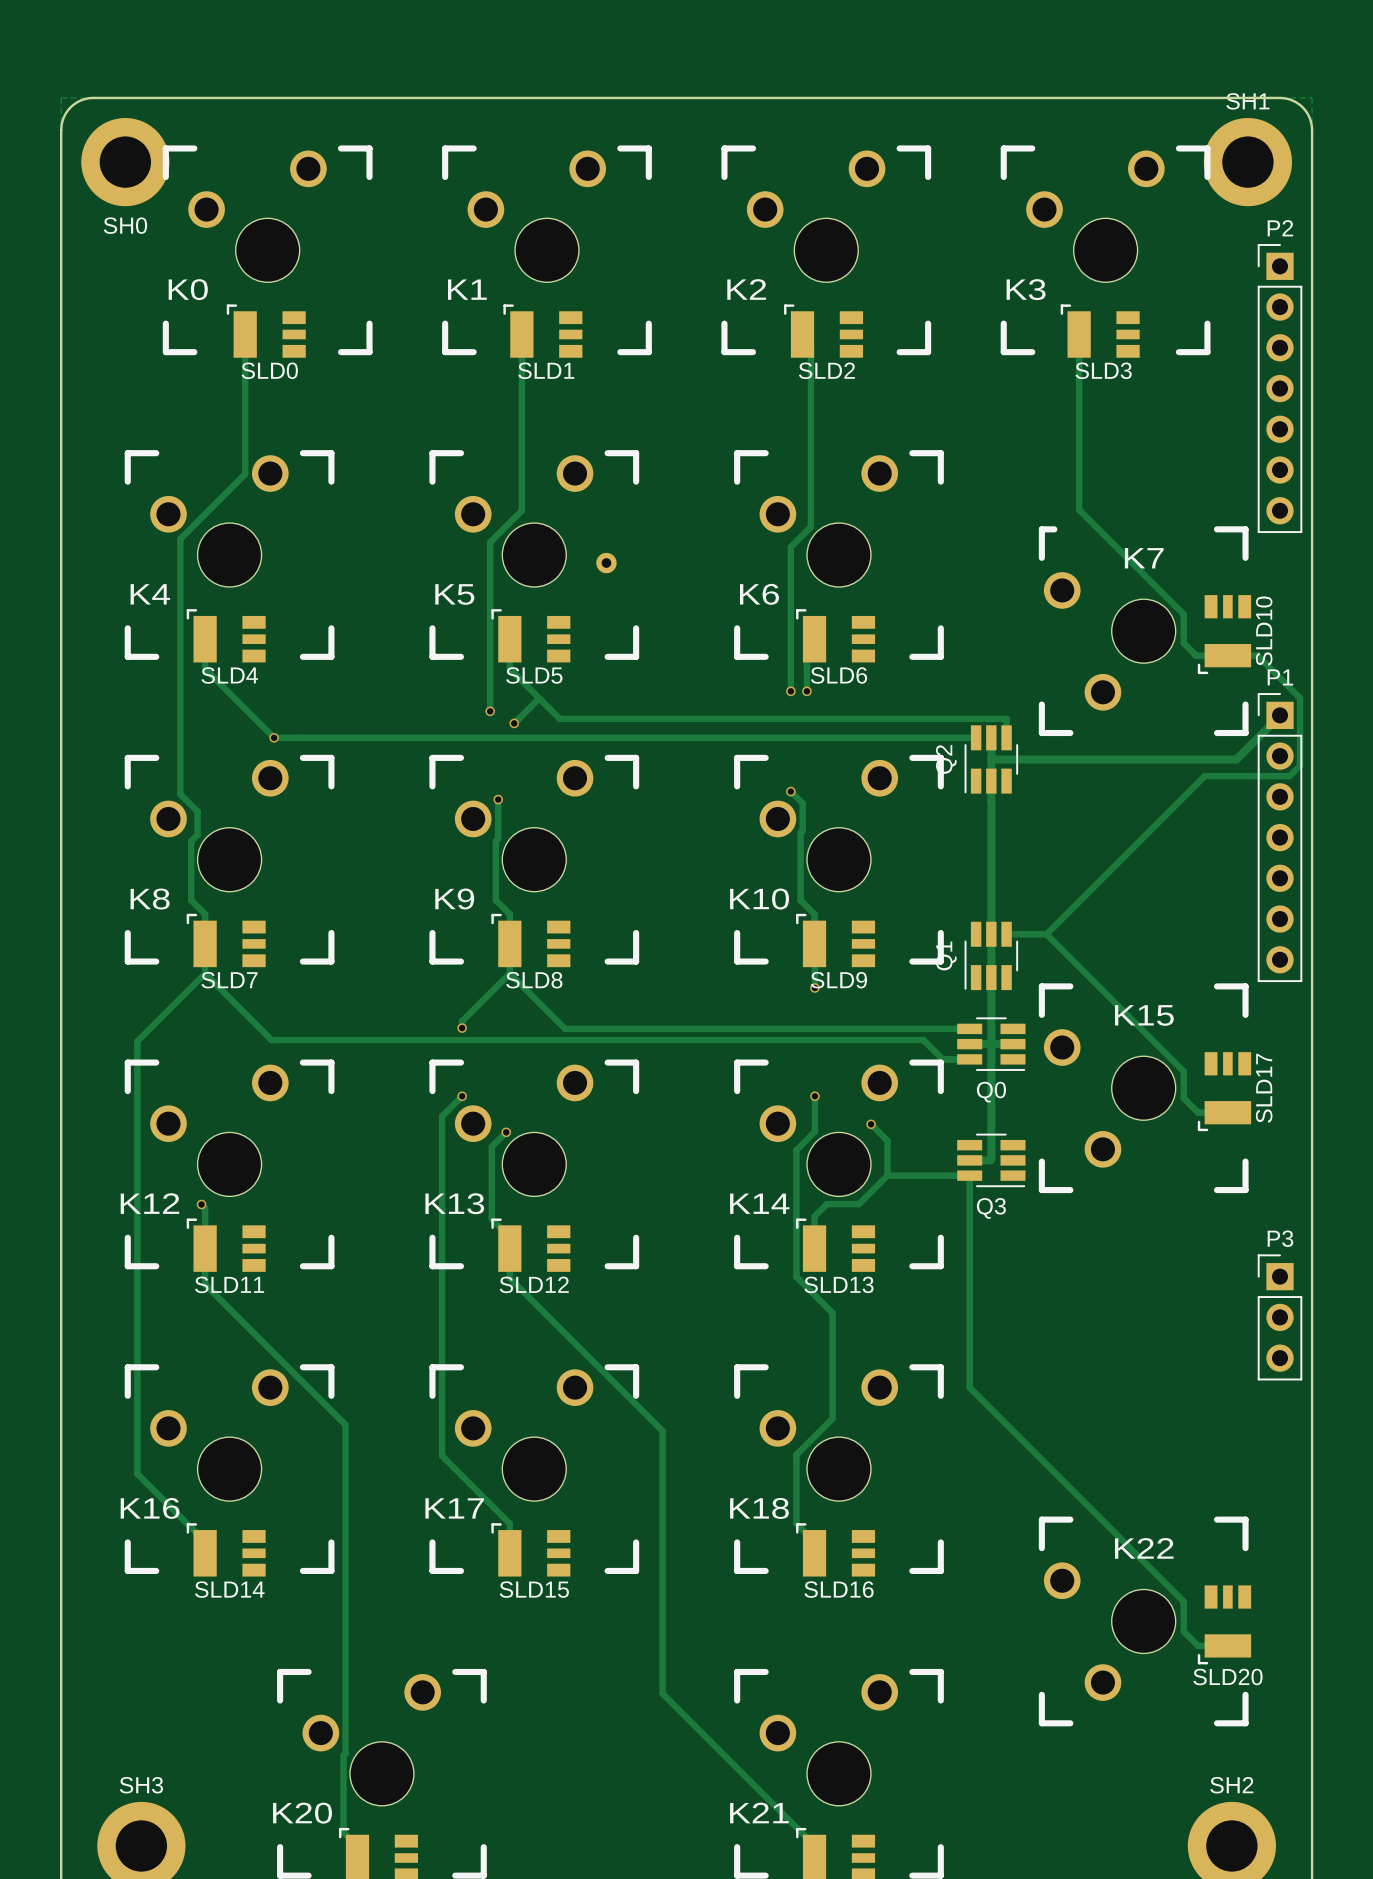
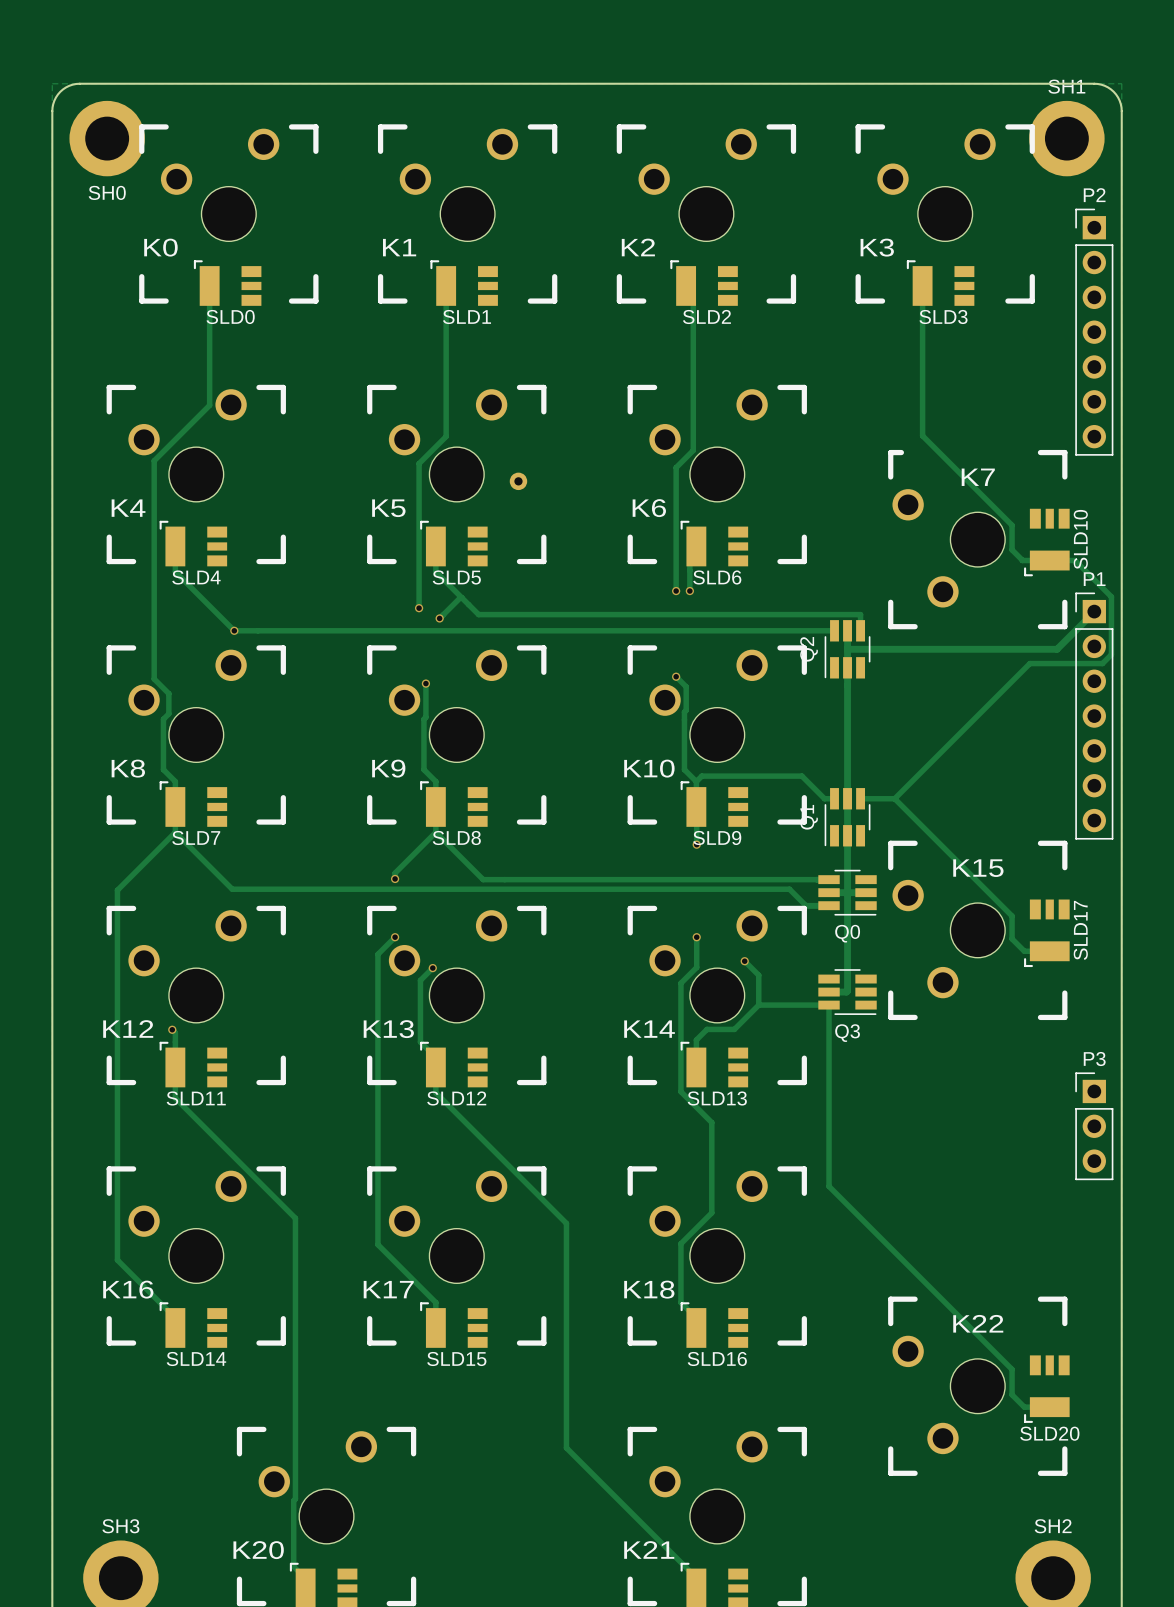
track: none -> (696, 781) (701, 776) (801, 776) (824, 798) (834, 798)

